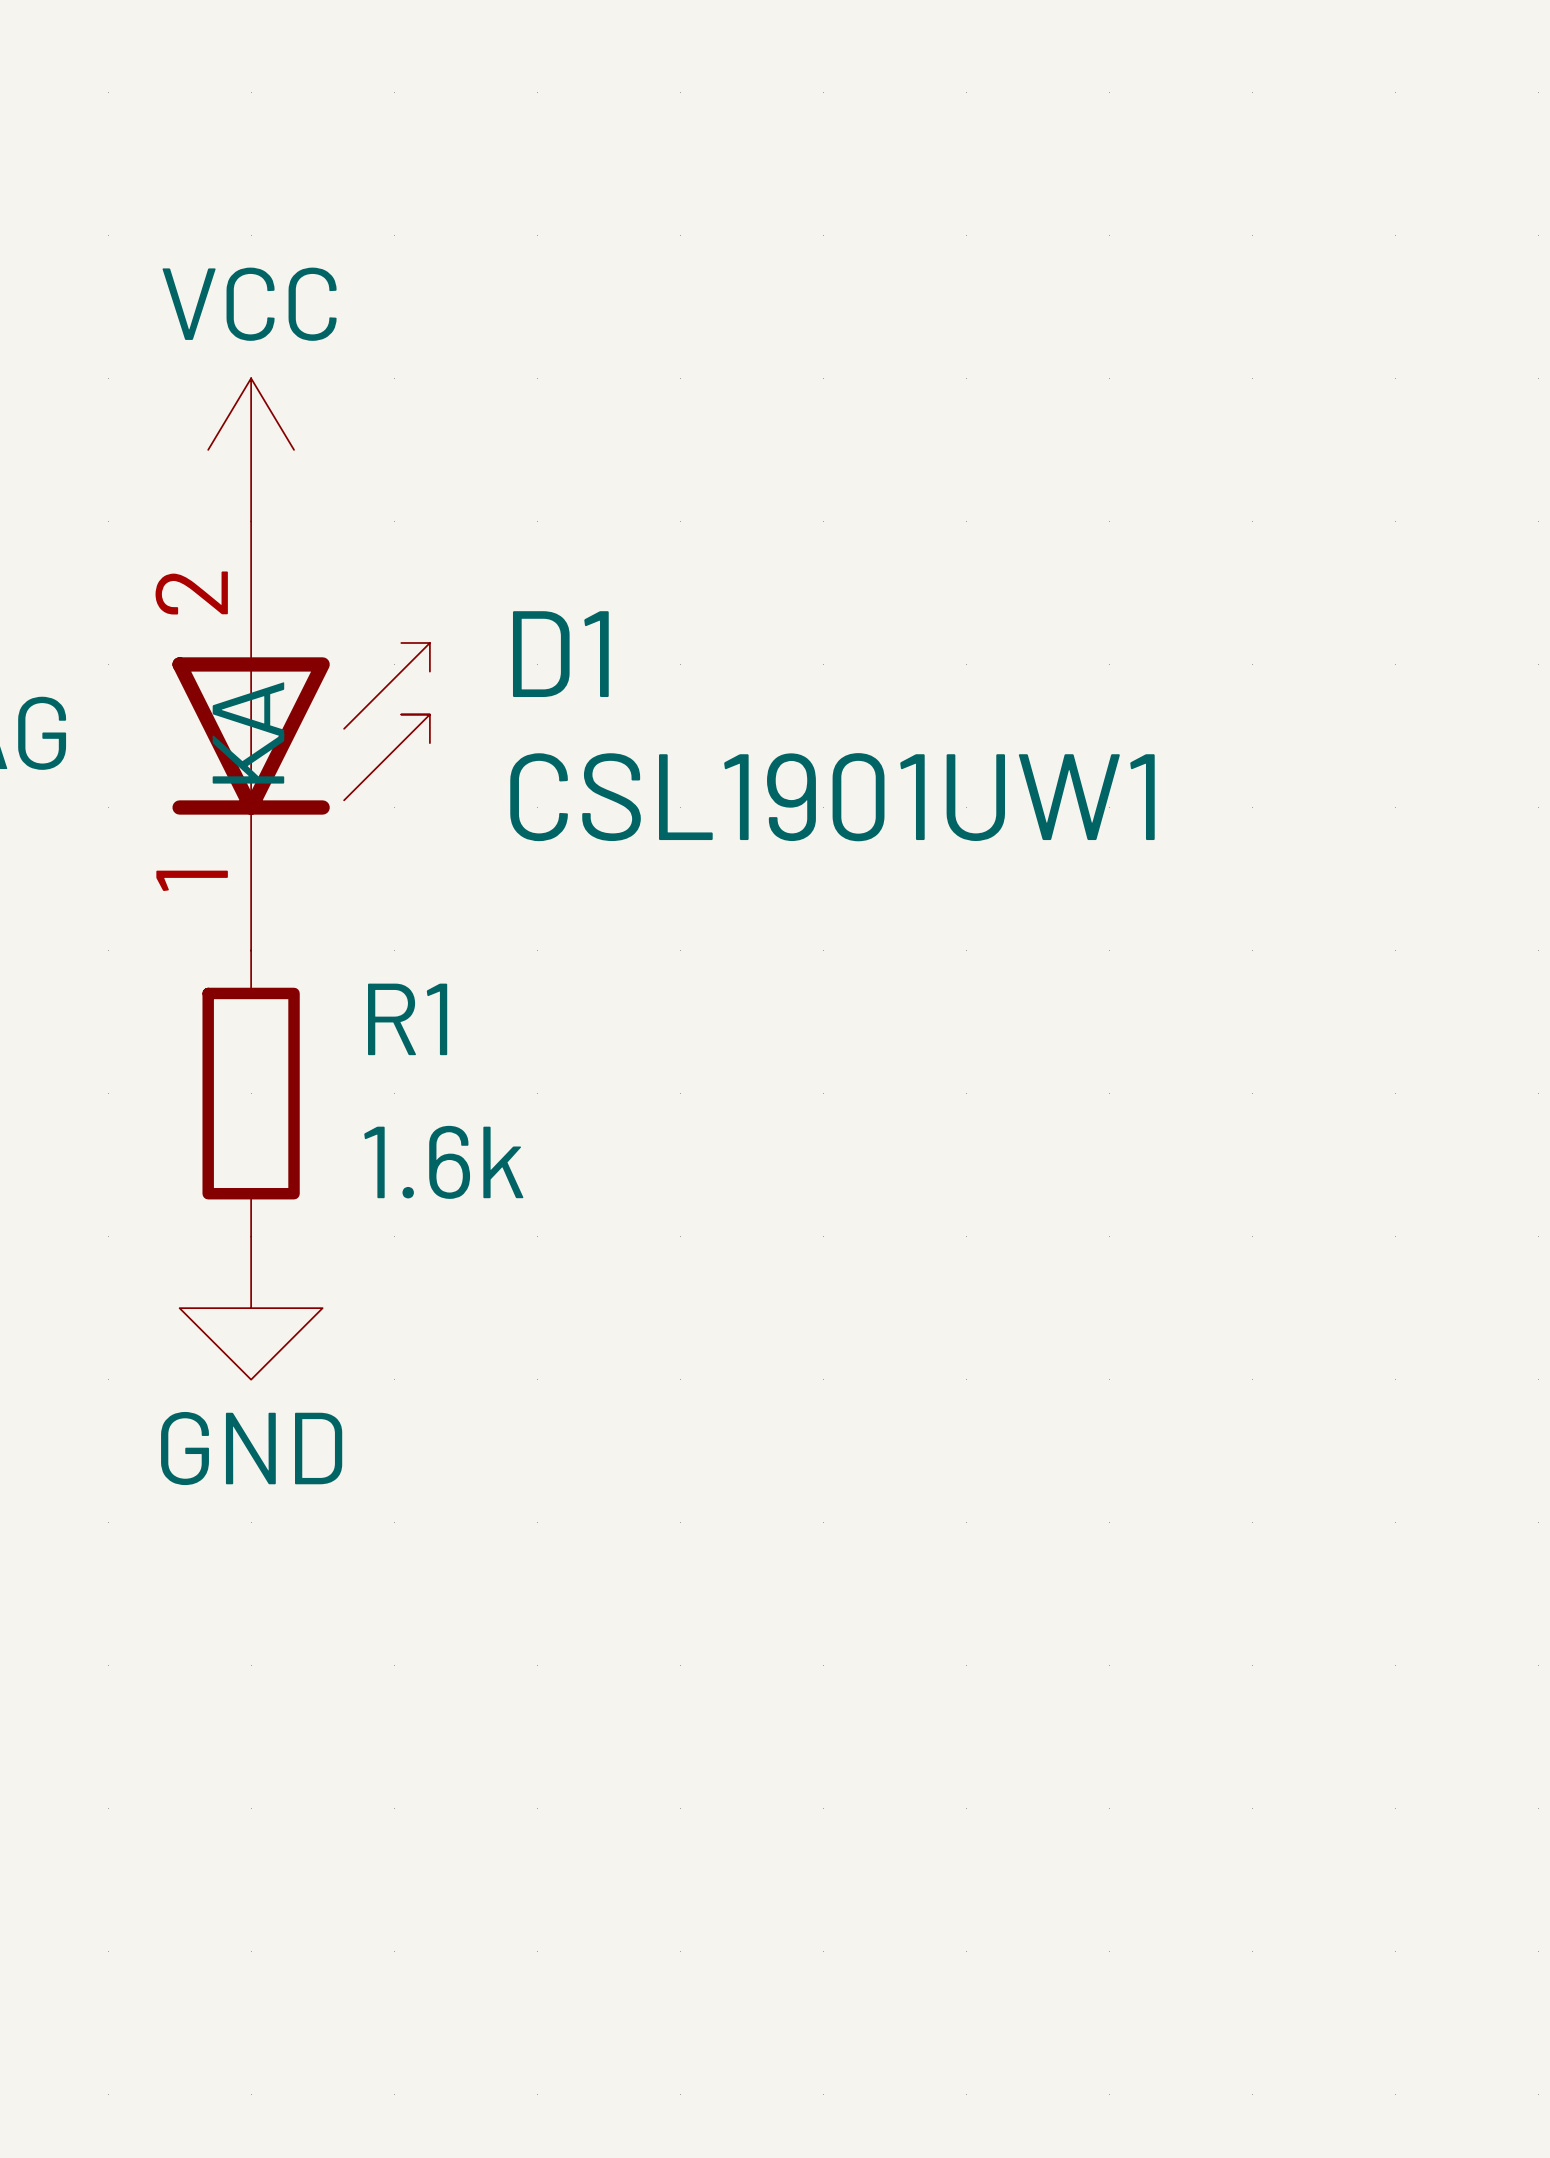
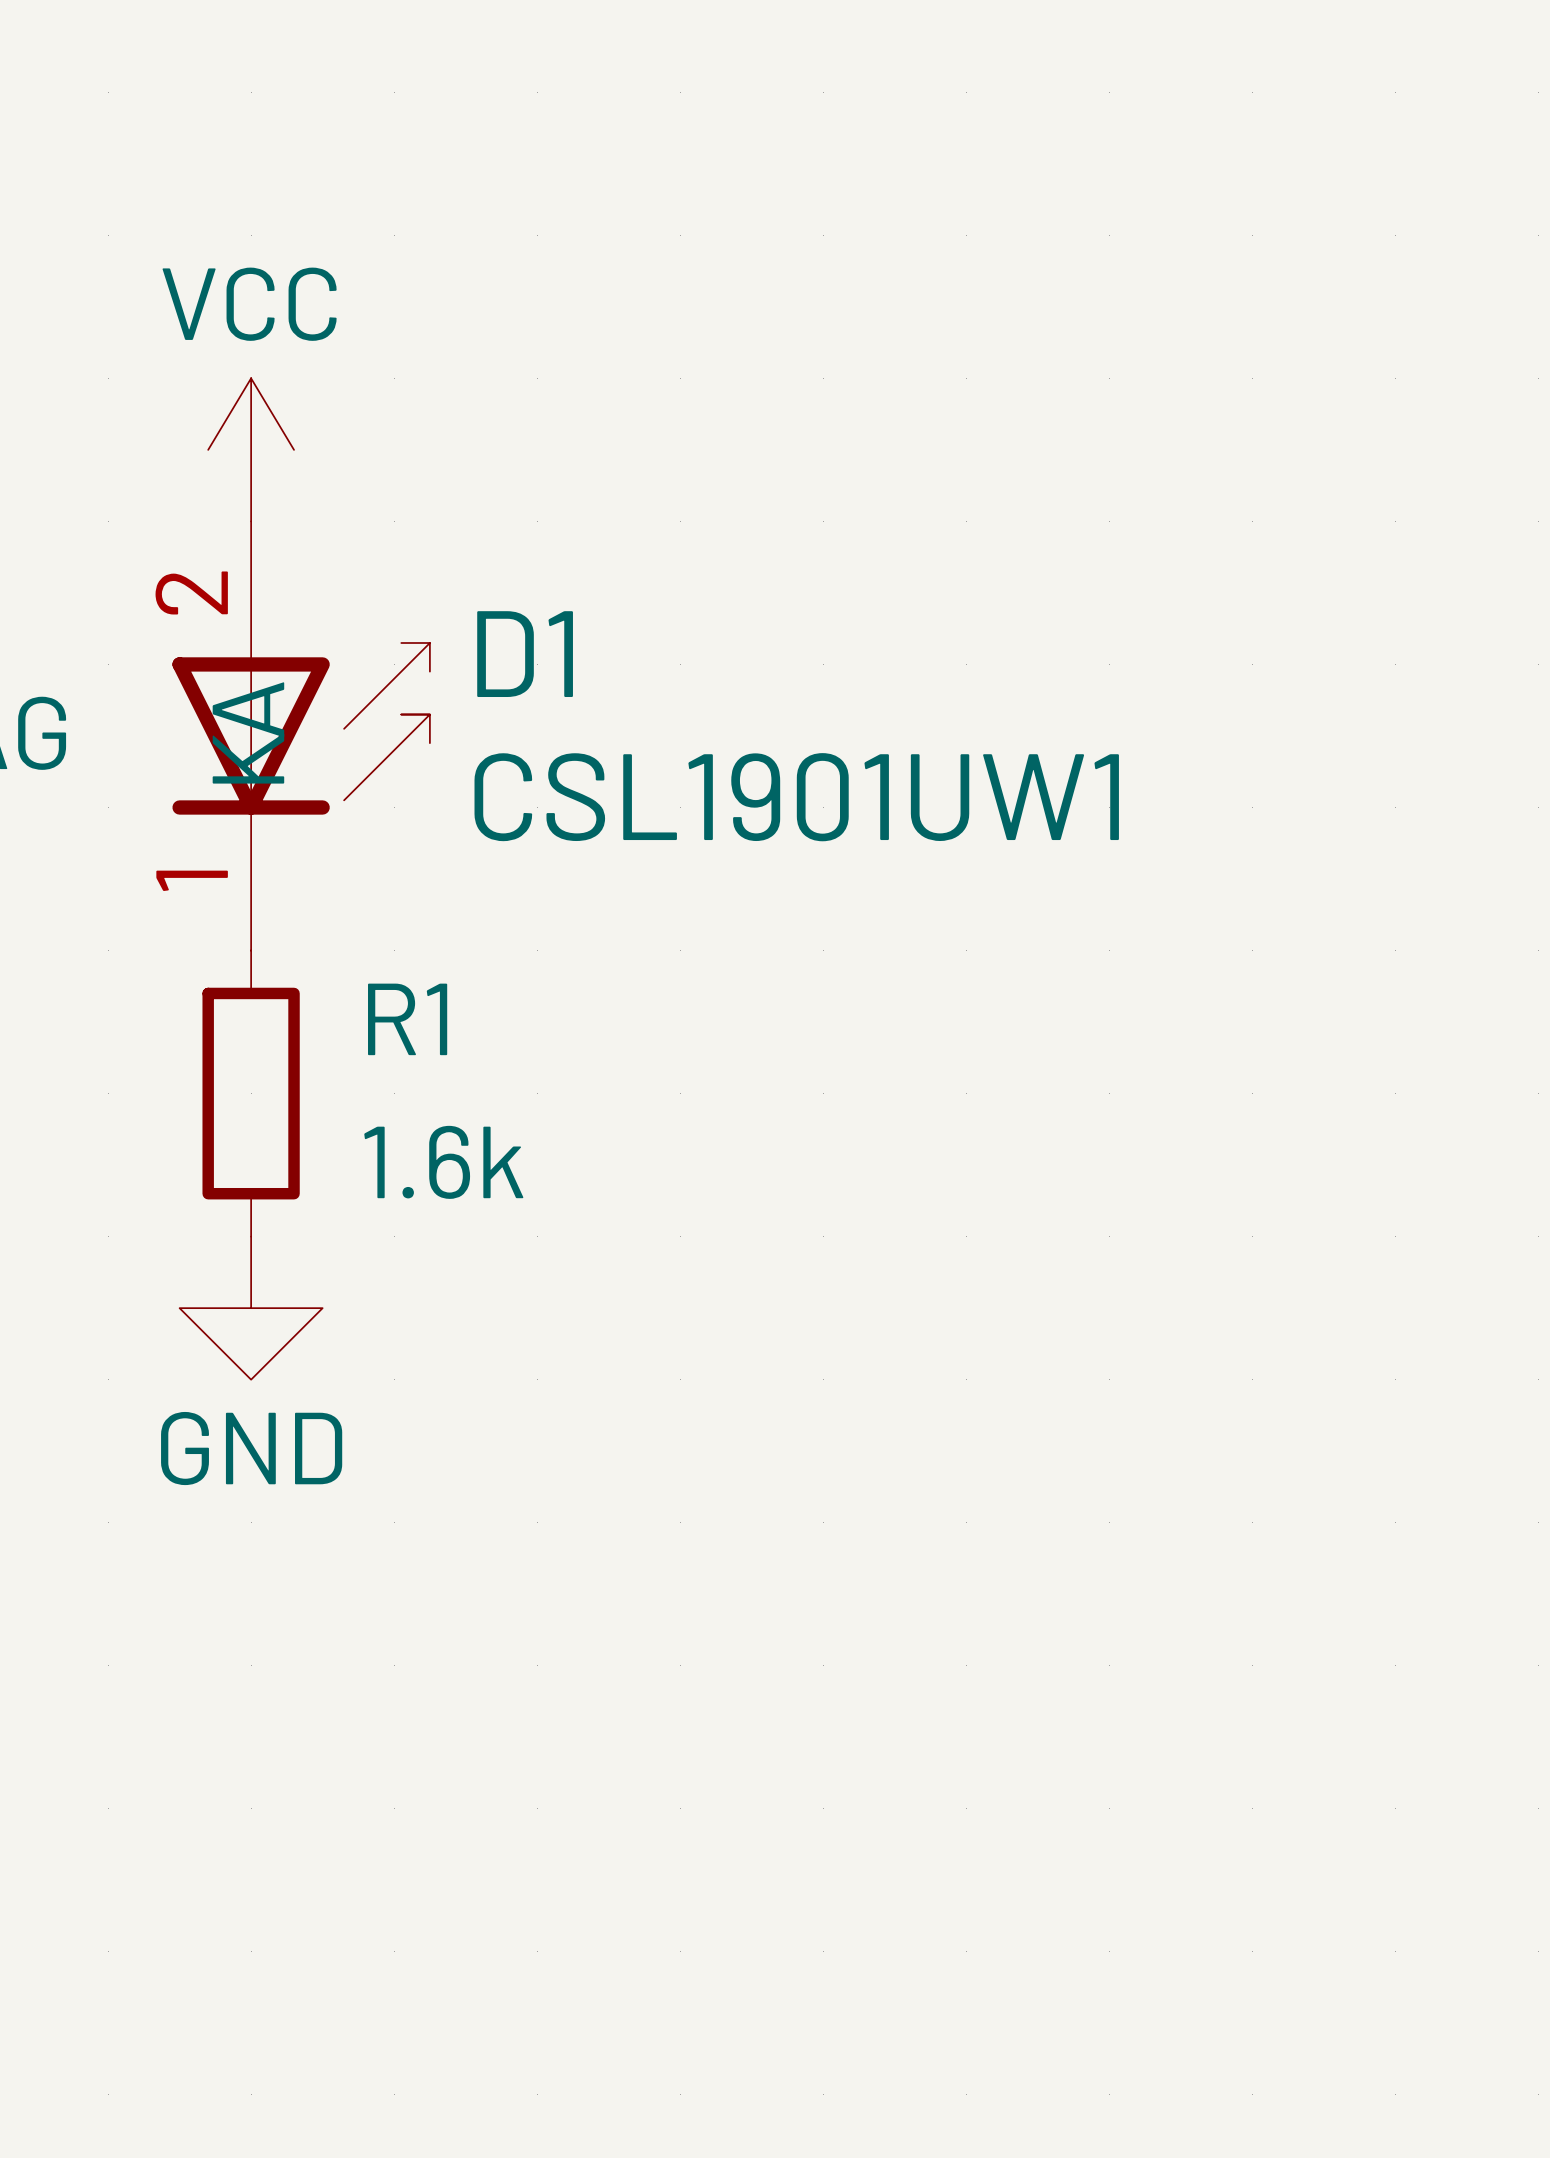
D1 name position: D1 (560, 654) -> D1 (525, 654)
D1 value position: CSL1901UW1 (832, 797) -> CSL1901UW1 (796, 797)

